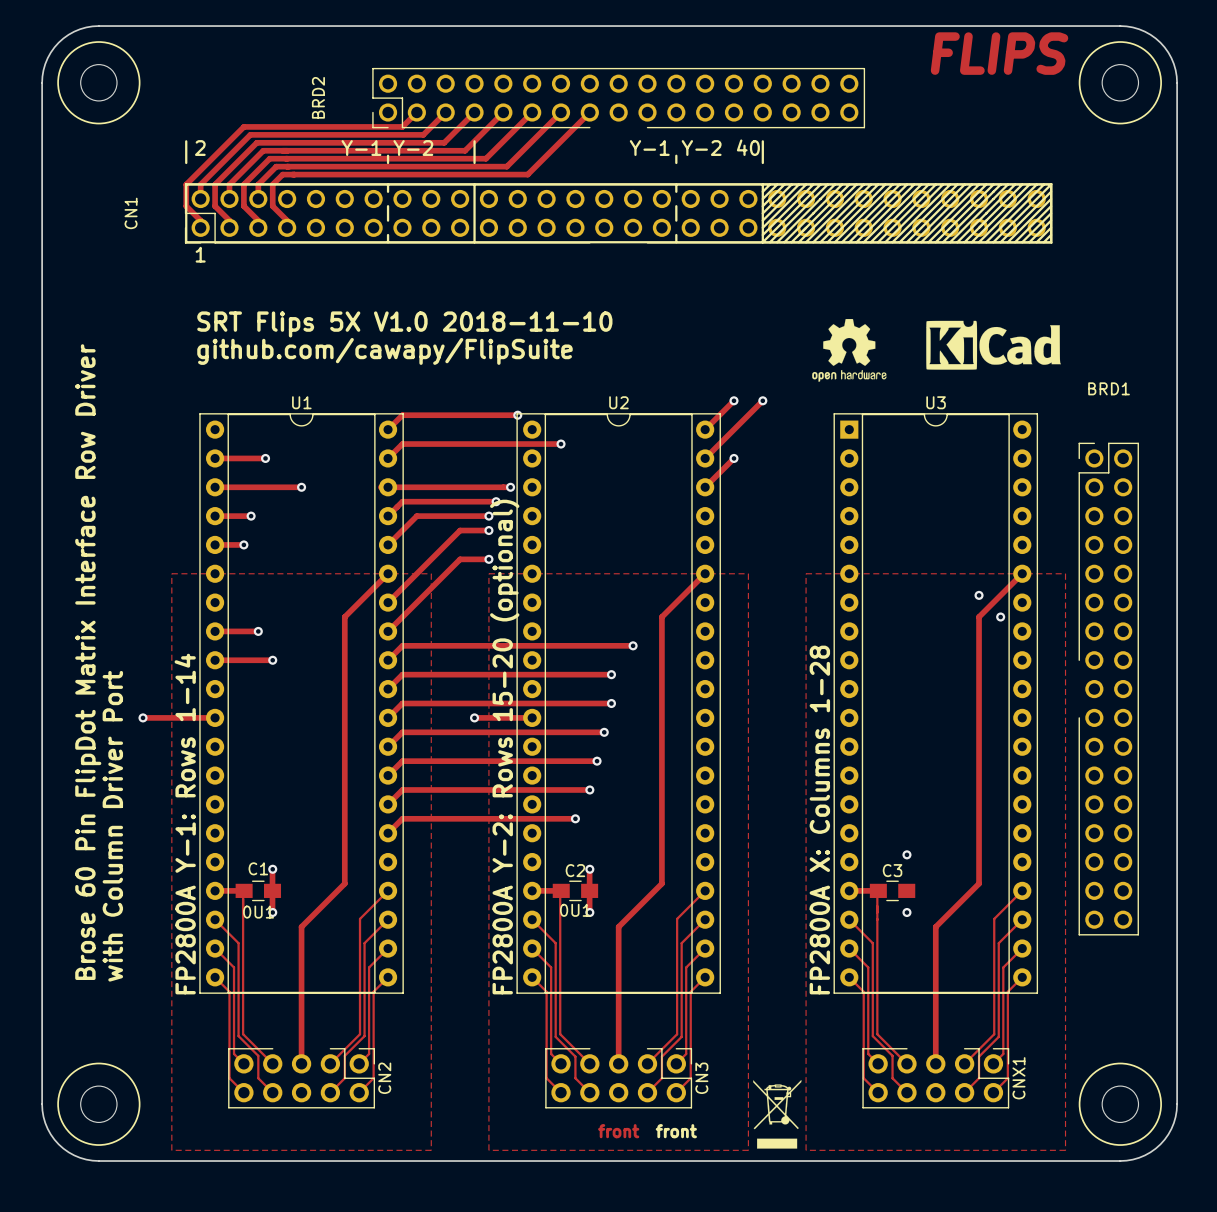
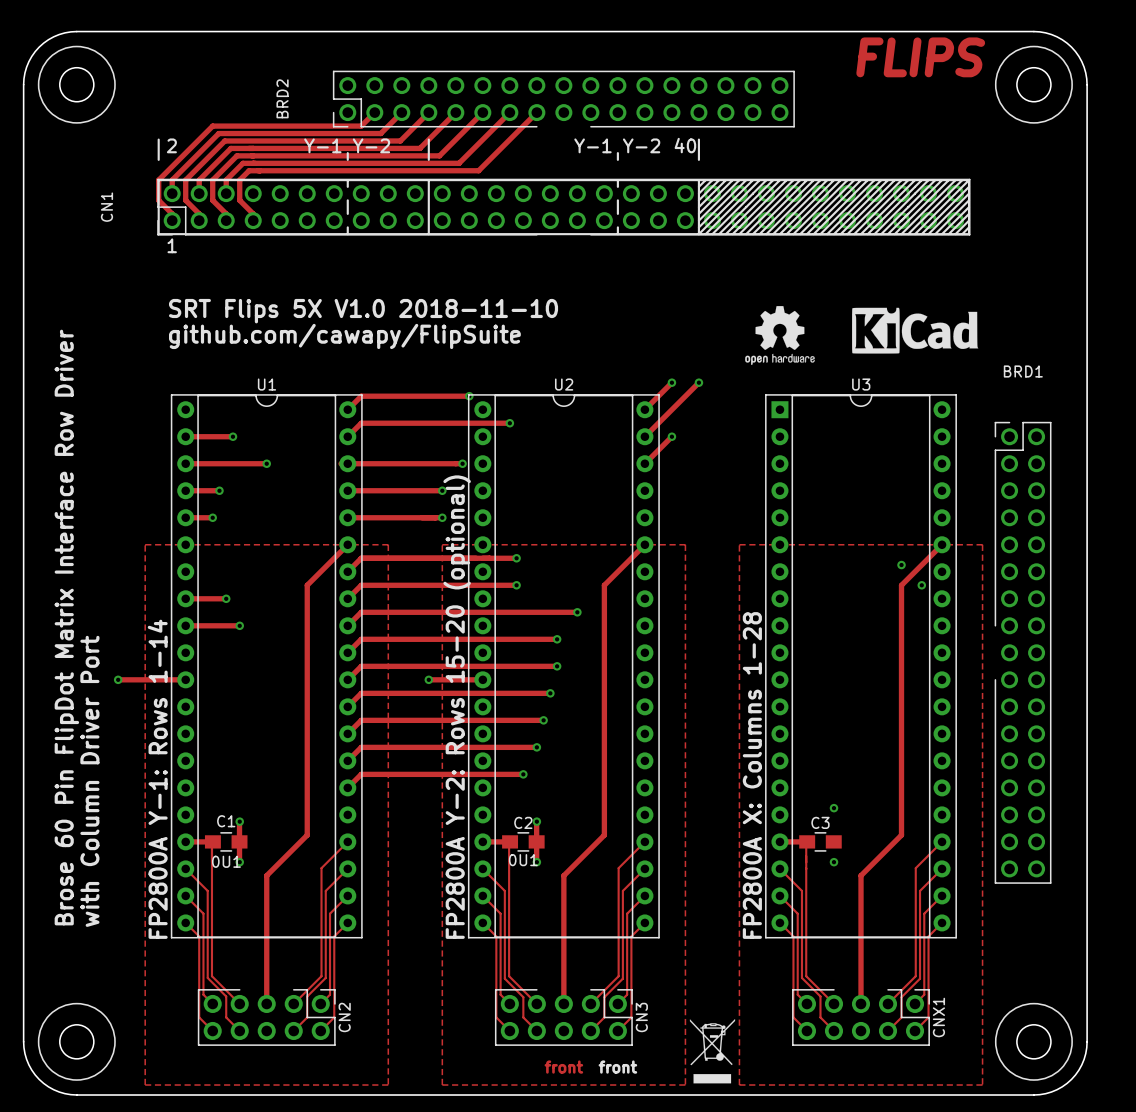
track: (496, 501) (402, 501) (388, 516) -> none
via: (496, 501) -> none
track: (416, 516) (388, 544) -> (374, 490) (347, 490)
track: (488, 530) (460, 530) (402, 588) -> (516, 558) (361, 558)
via: (488, 530) -> none
track: none -> (347, 517) (442, 517)
via: none -> (442, 517)
track: (488, 559) (460, 559) (402, 617) -> (516, 585) (361, 585)
via: (488, 559) -> none
via: none -> (516, 558)
via: none -> (516, 585)

